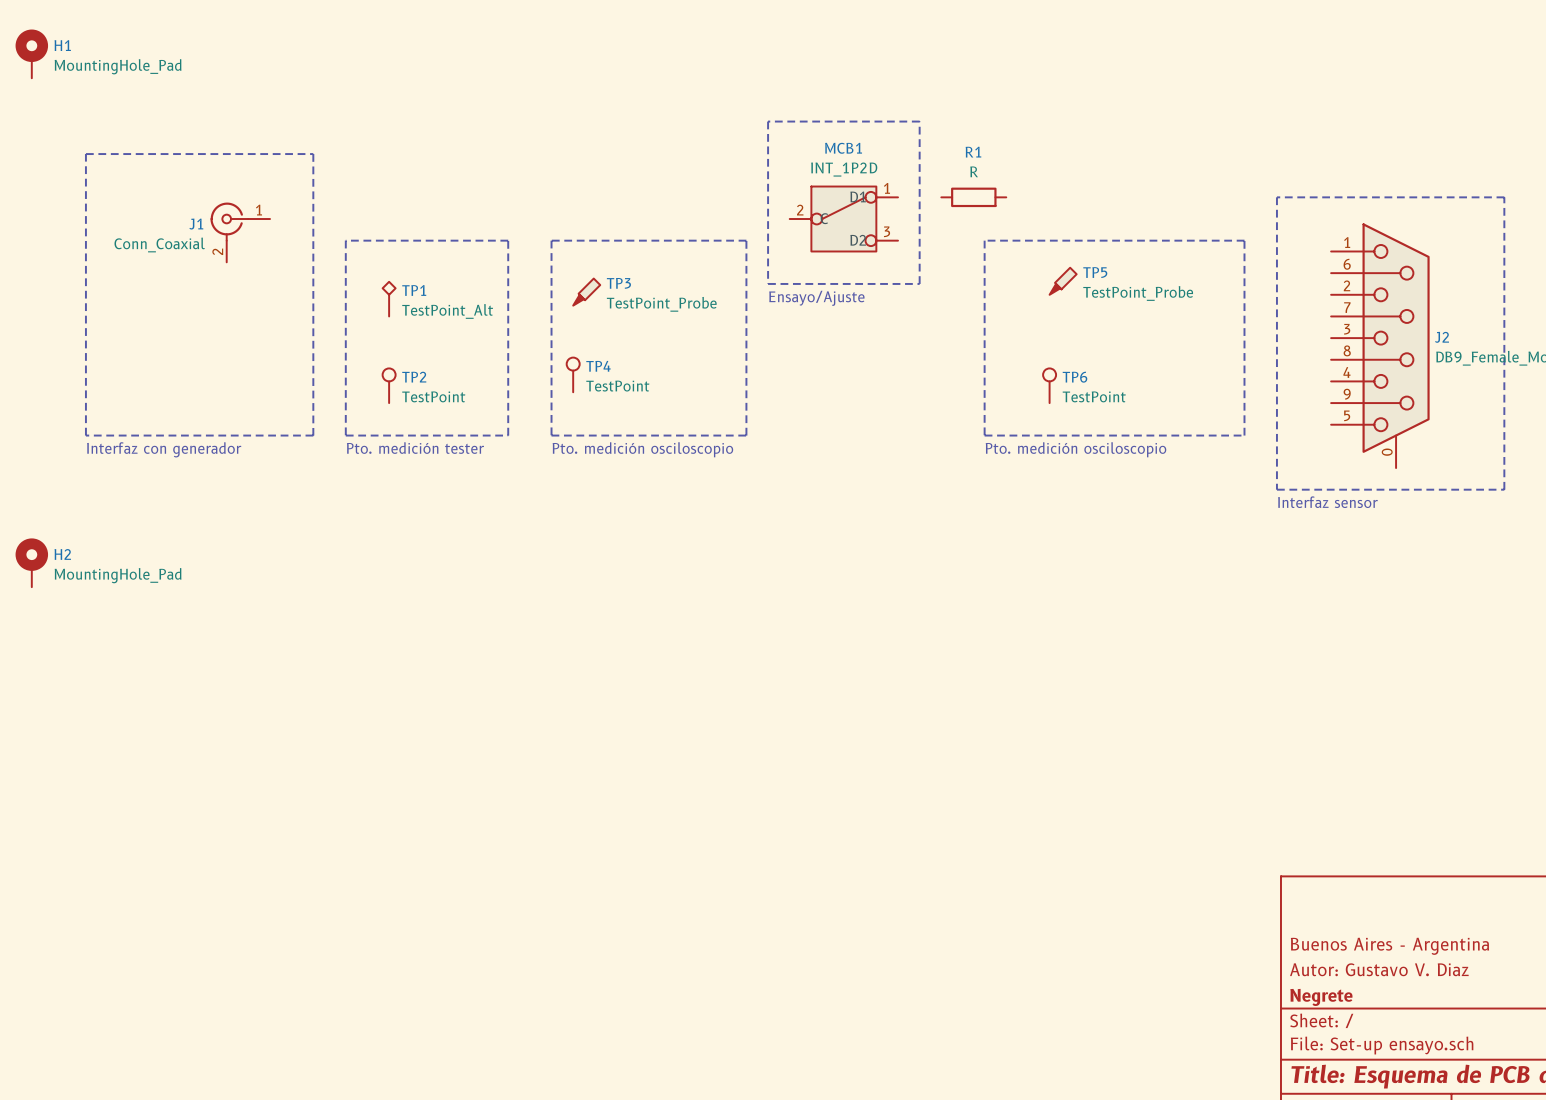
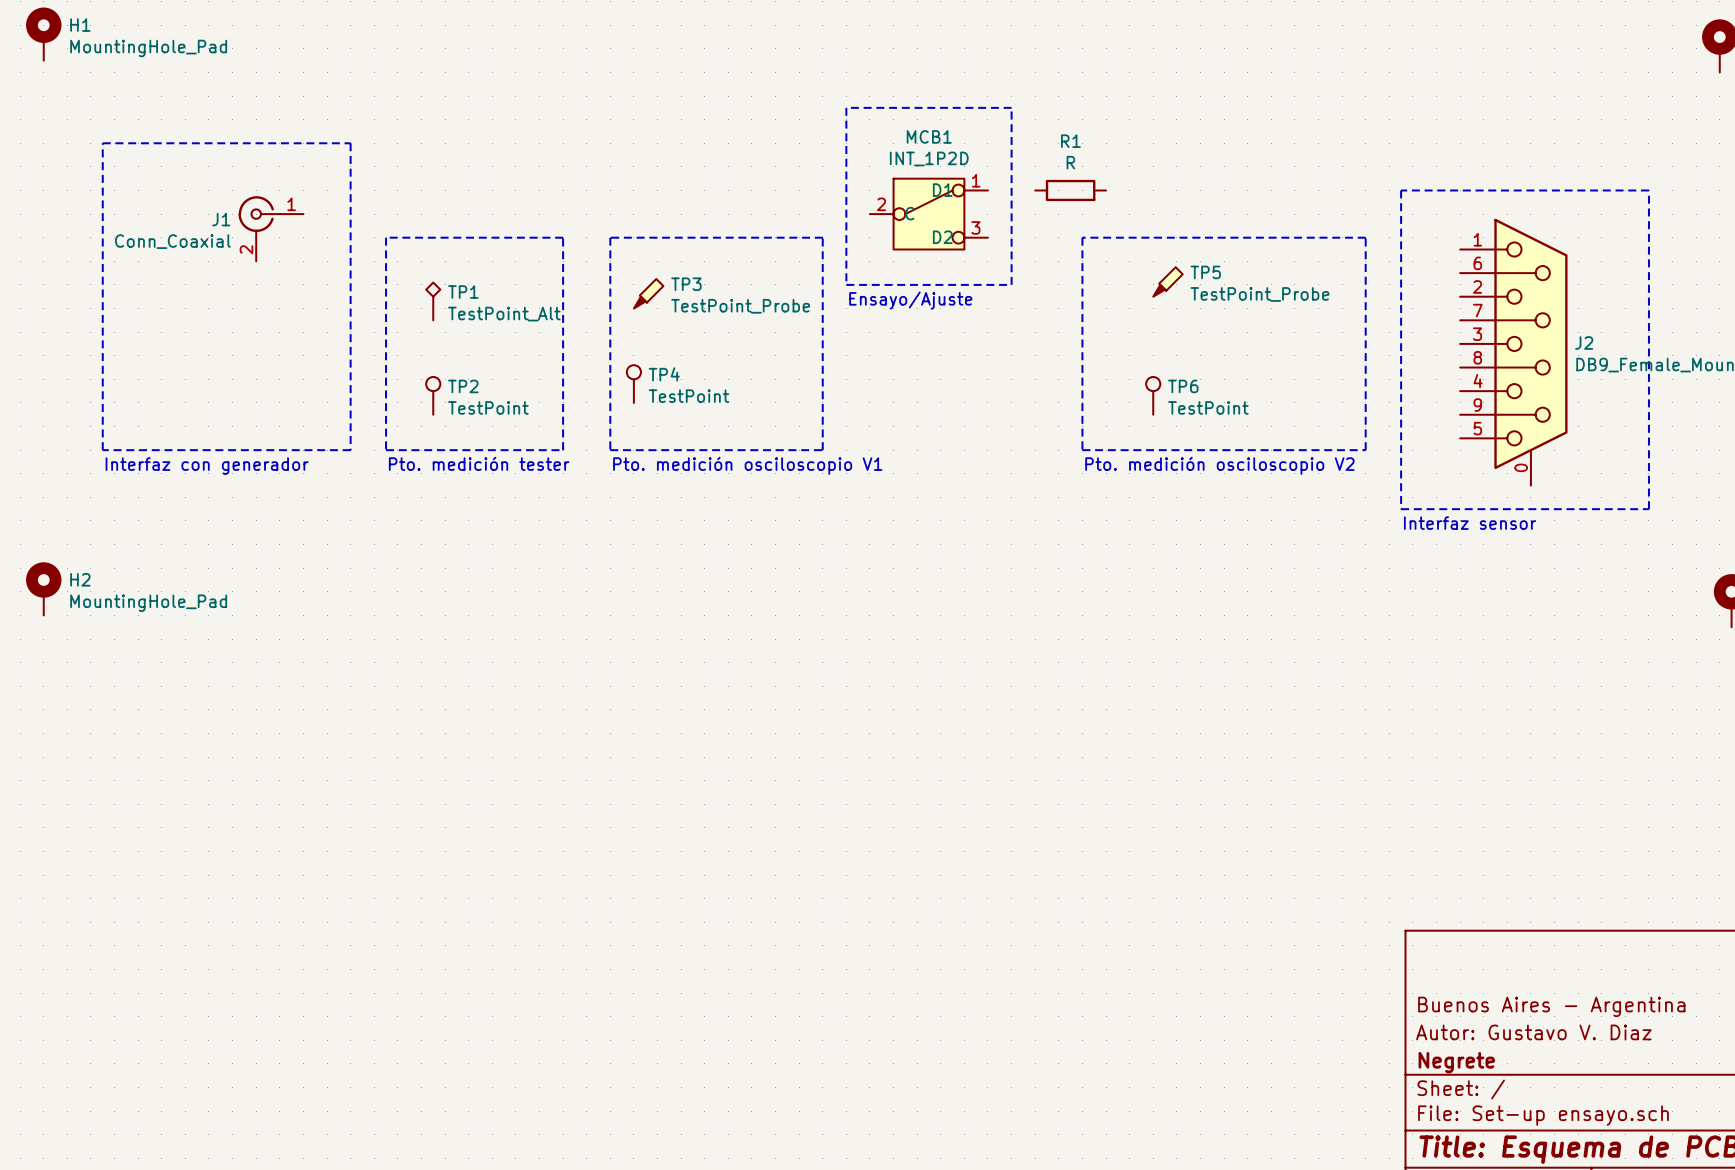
text: Pto. medición osciloscopio (642, 449) -> Pto. medición osciloscopio V1 (747, 465)
text: Pto. medición osciloscopio (1076, 449) -> Pto. medición osciloscopio V2 (1219, 465)

